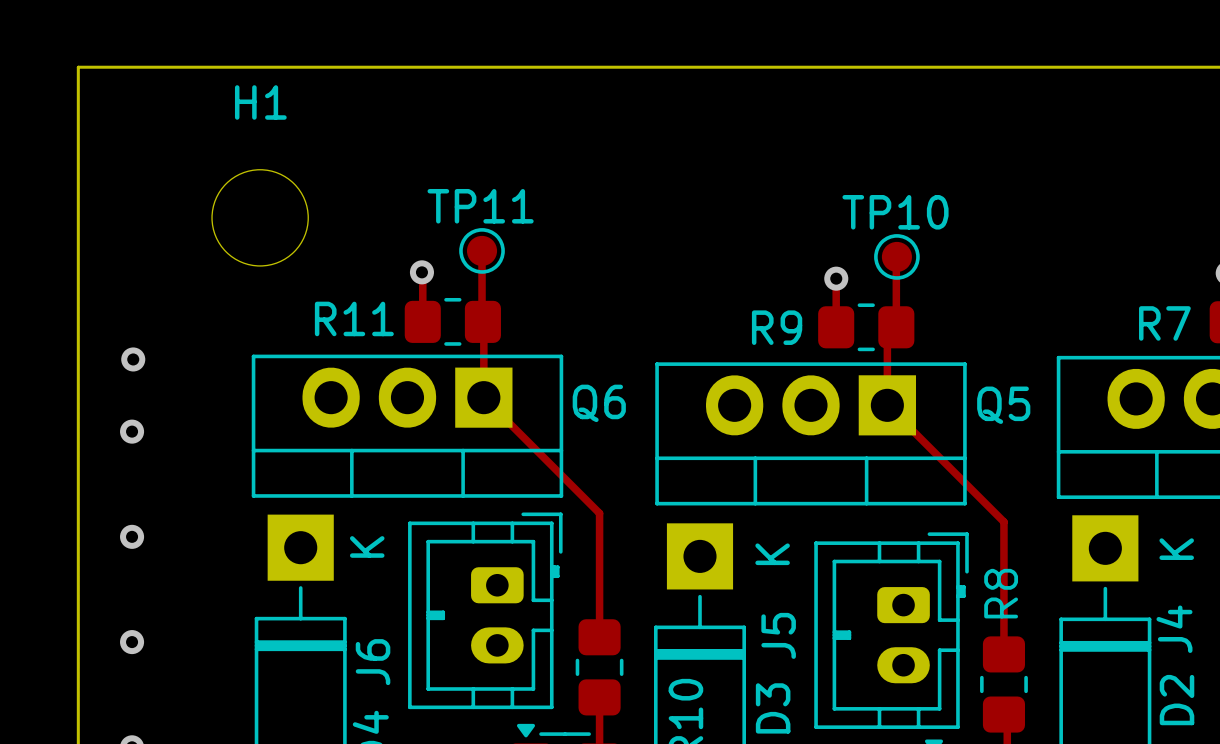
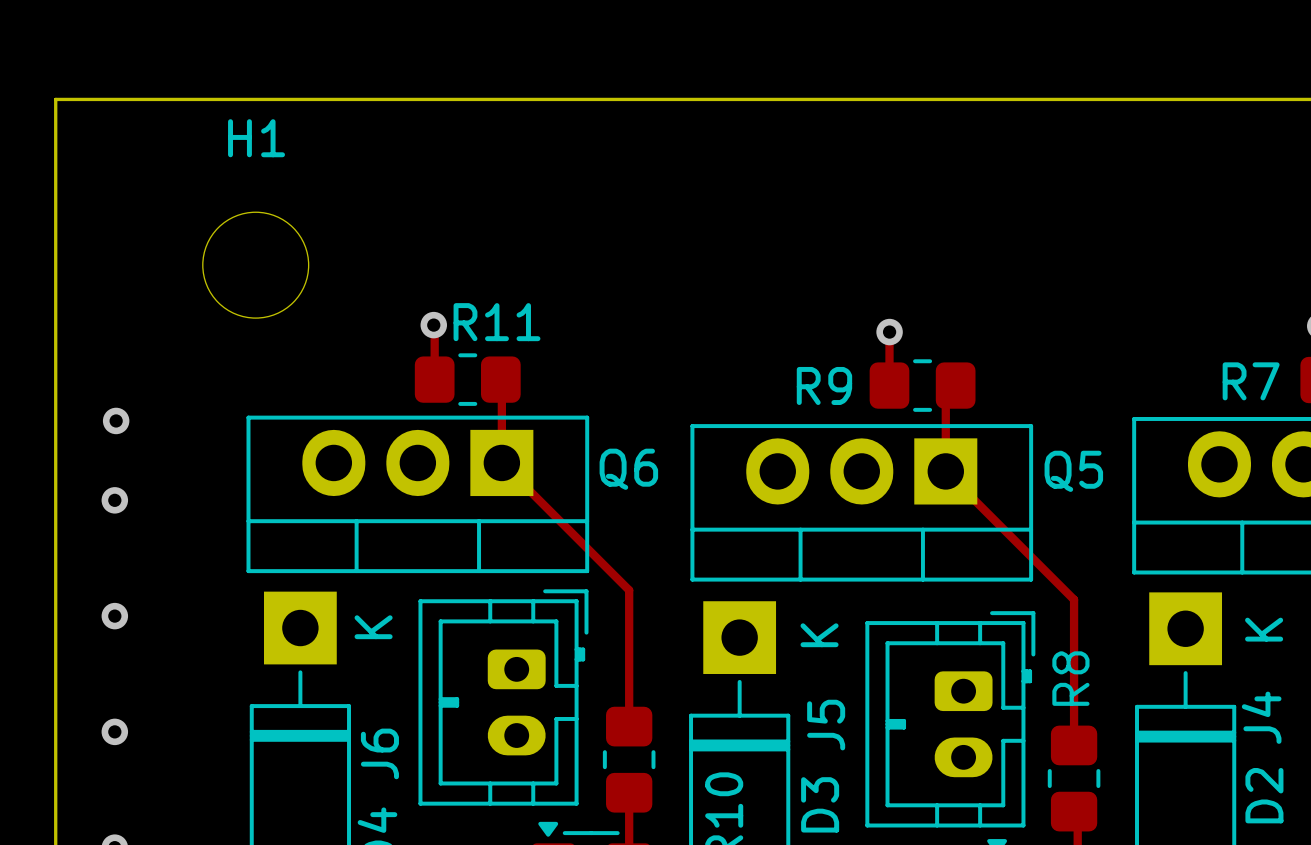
track: (482, 250) (482, 321) -> none
TP11: (482, 250) -> none
TP10: (896, 256) -> none
track: (897, 262) (896, 327) -> none
R11 name position: R11 (354, 318) -> R11 (496, 322)

